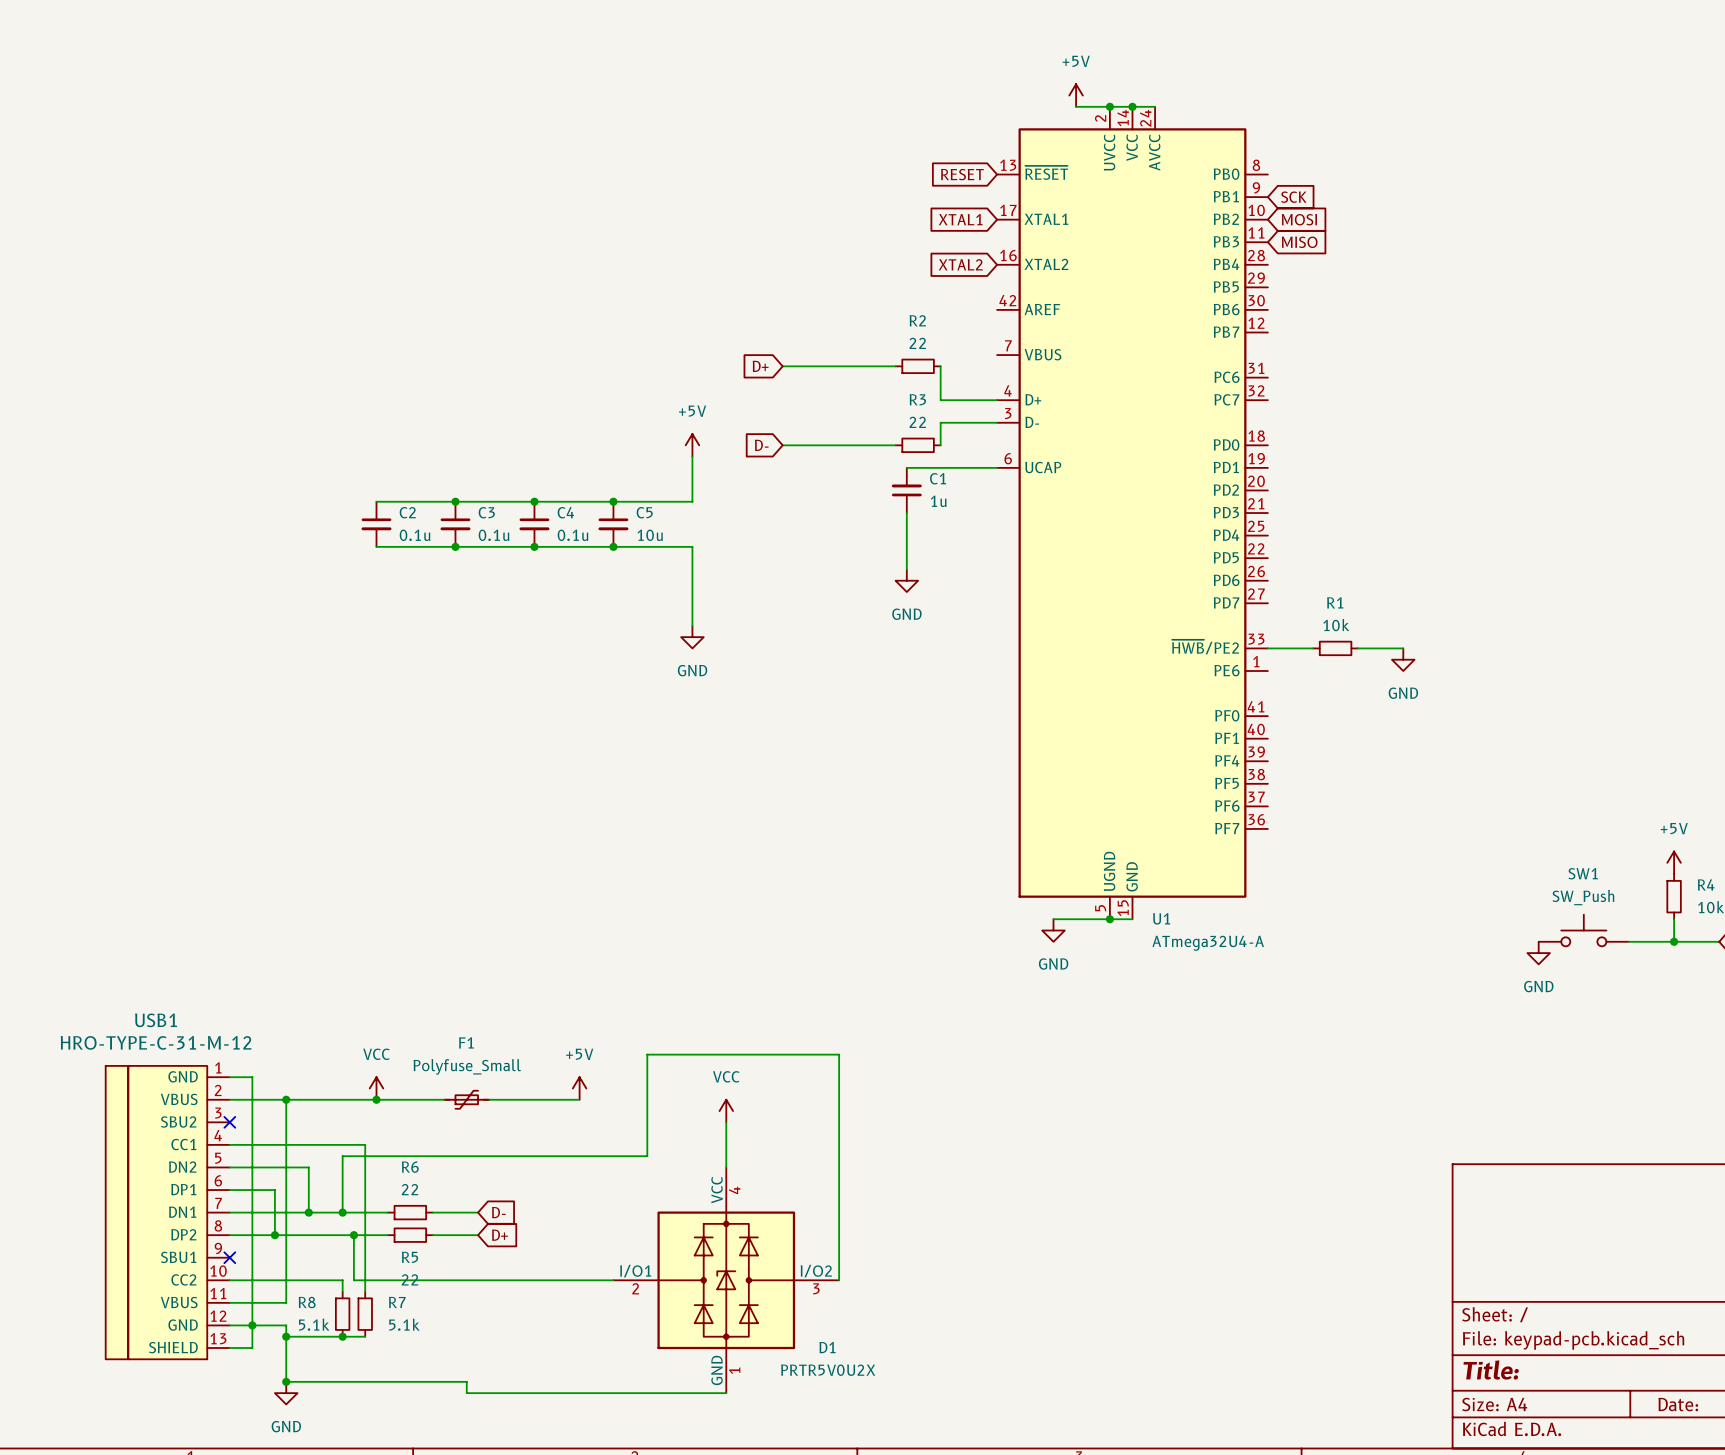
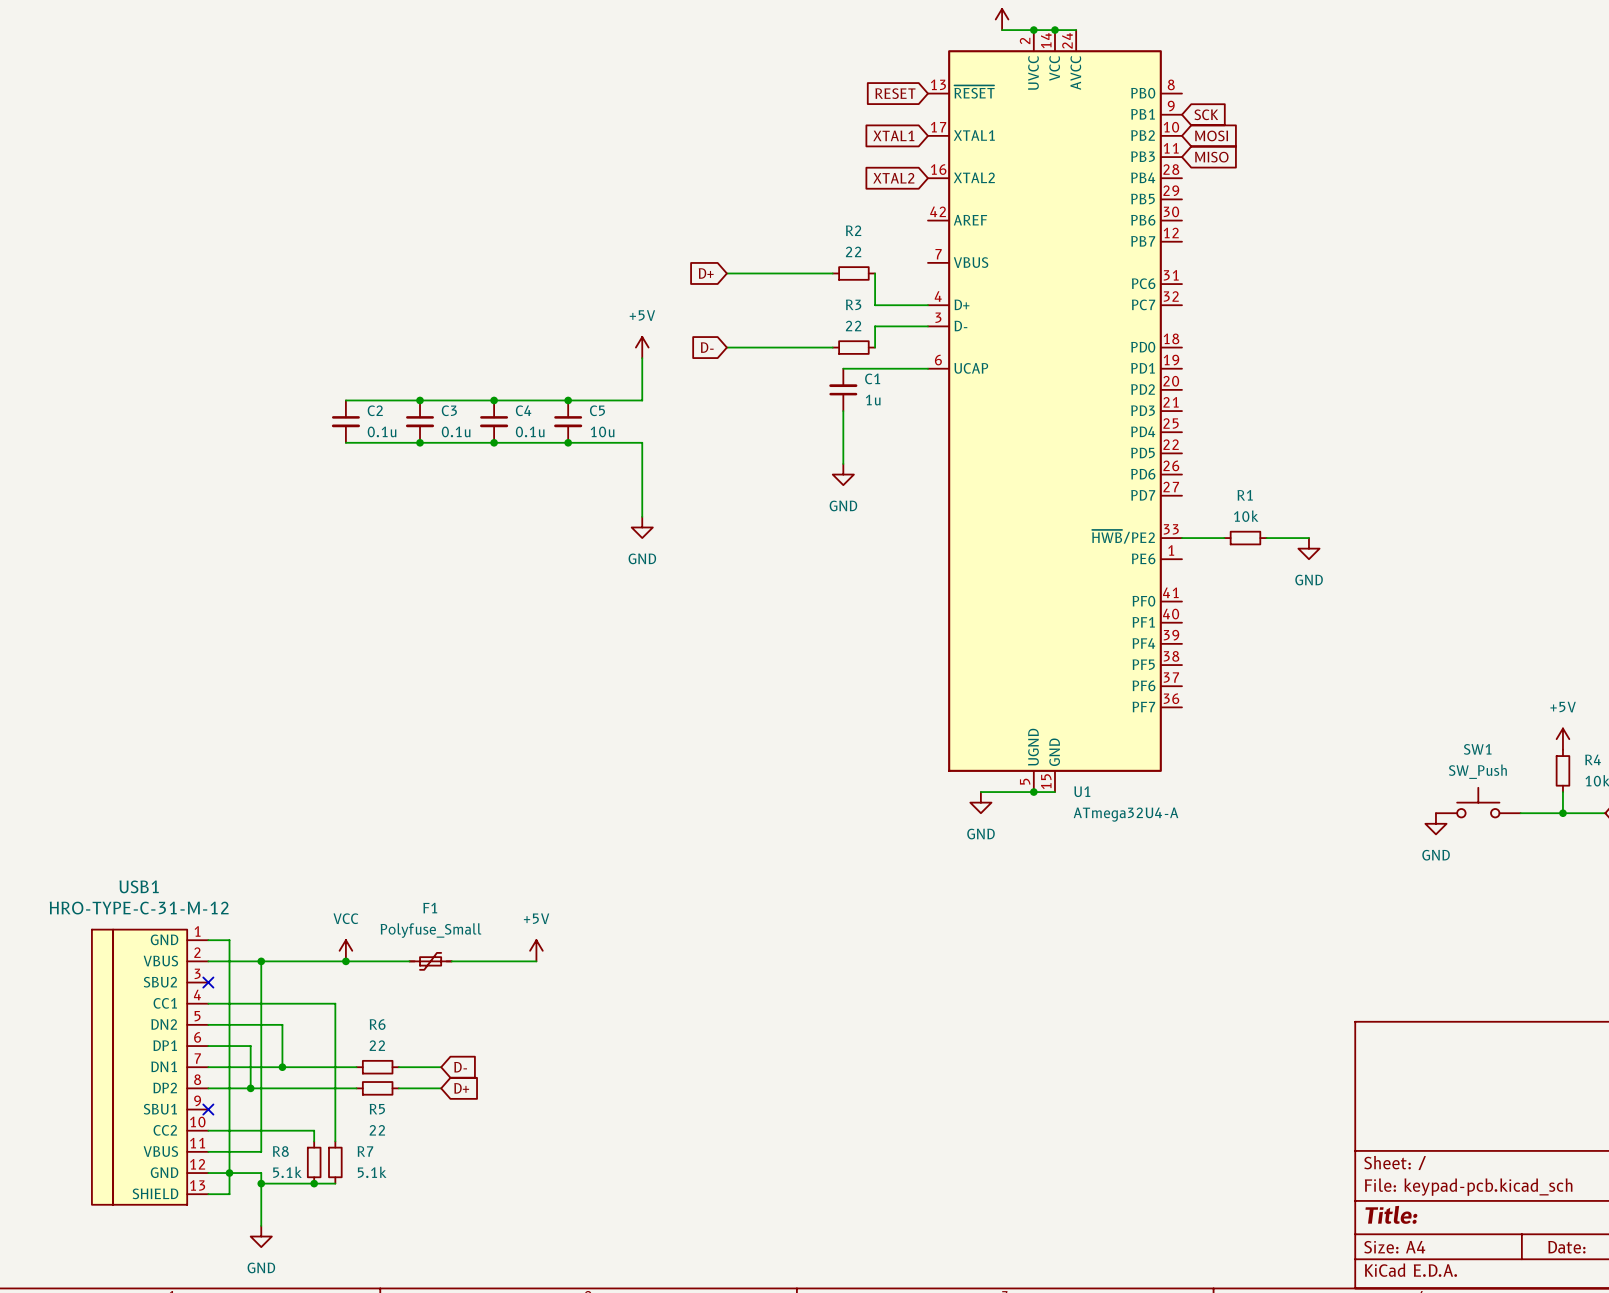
power symbol: VCC (726, 1111) -> none
wire: (726, 1122) (726, 1167) -> none
wire: (342, 1212) (342, 1156) (647, 1156) (647, 1054) (839, 1054) (839, 1280) -> none
junction: (342, 1212) -> none
wire: (353, 1235) (353, 1280) (613, 1280) -> none
junction: (353, 1235) -> none
D1: PRTR5V0U2X (726, 1280) -> none
wire: (286, 1381) (466, 1381) (466, 1393) (726, 1393) -> none
junction: (286, 1381) -> none

